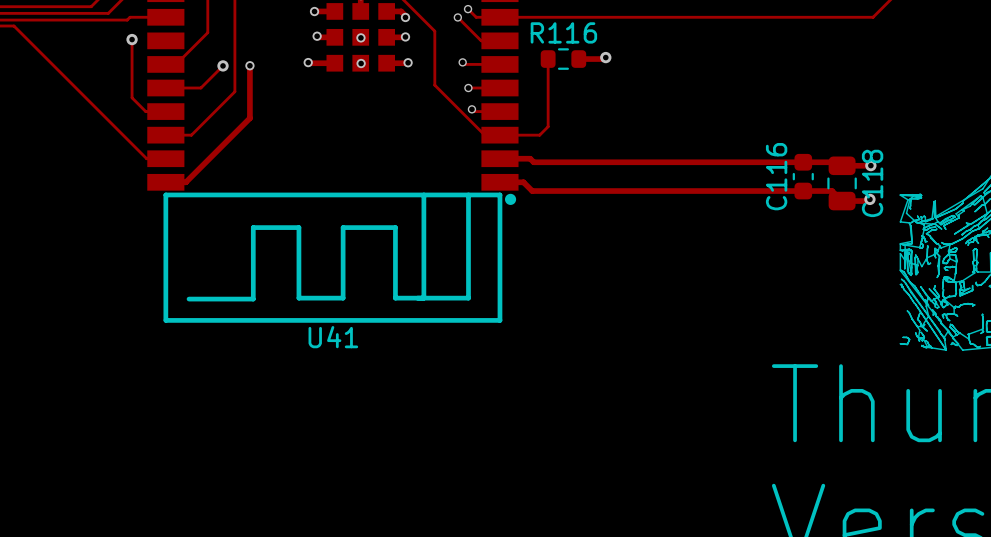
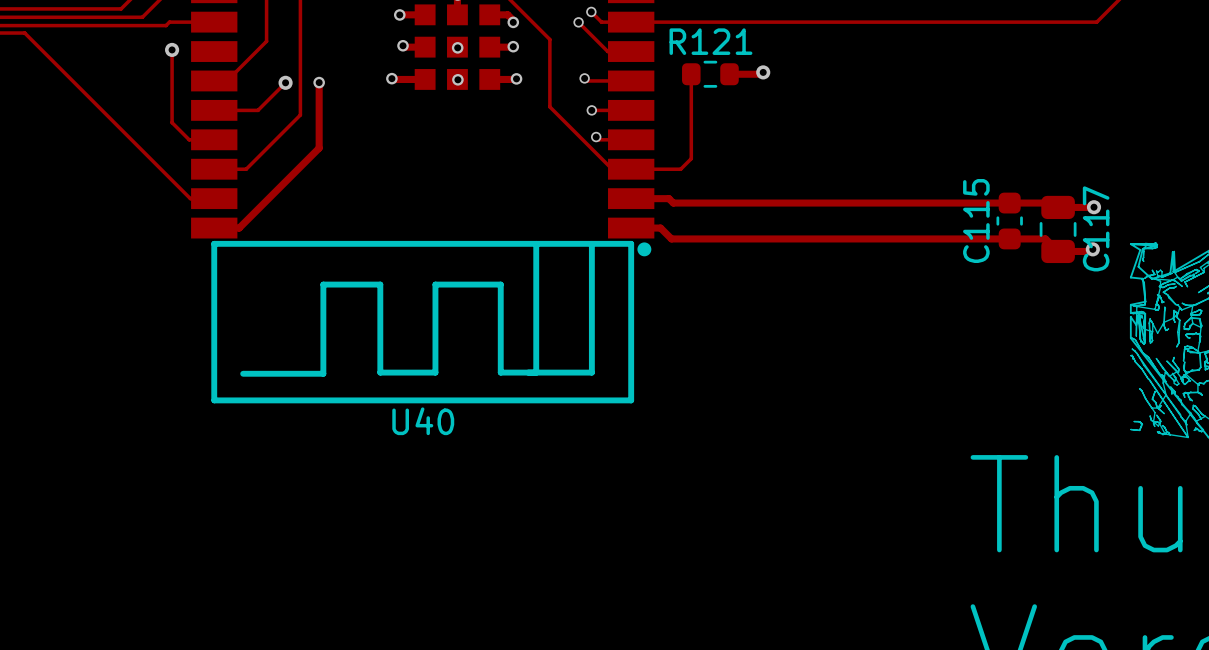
R116 name: R116 (563, 32) -> R121 (710, 41)
C116 name: C116 (776, 176) -> C115 (976, 220)
C118 name: C118 (872, 183) -> C117 (1096, 228)
U41 name: U41 (333, 337) -> U40 (423, 421)

